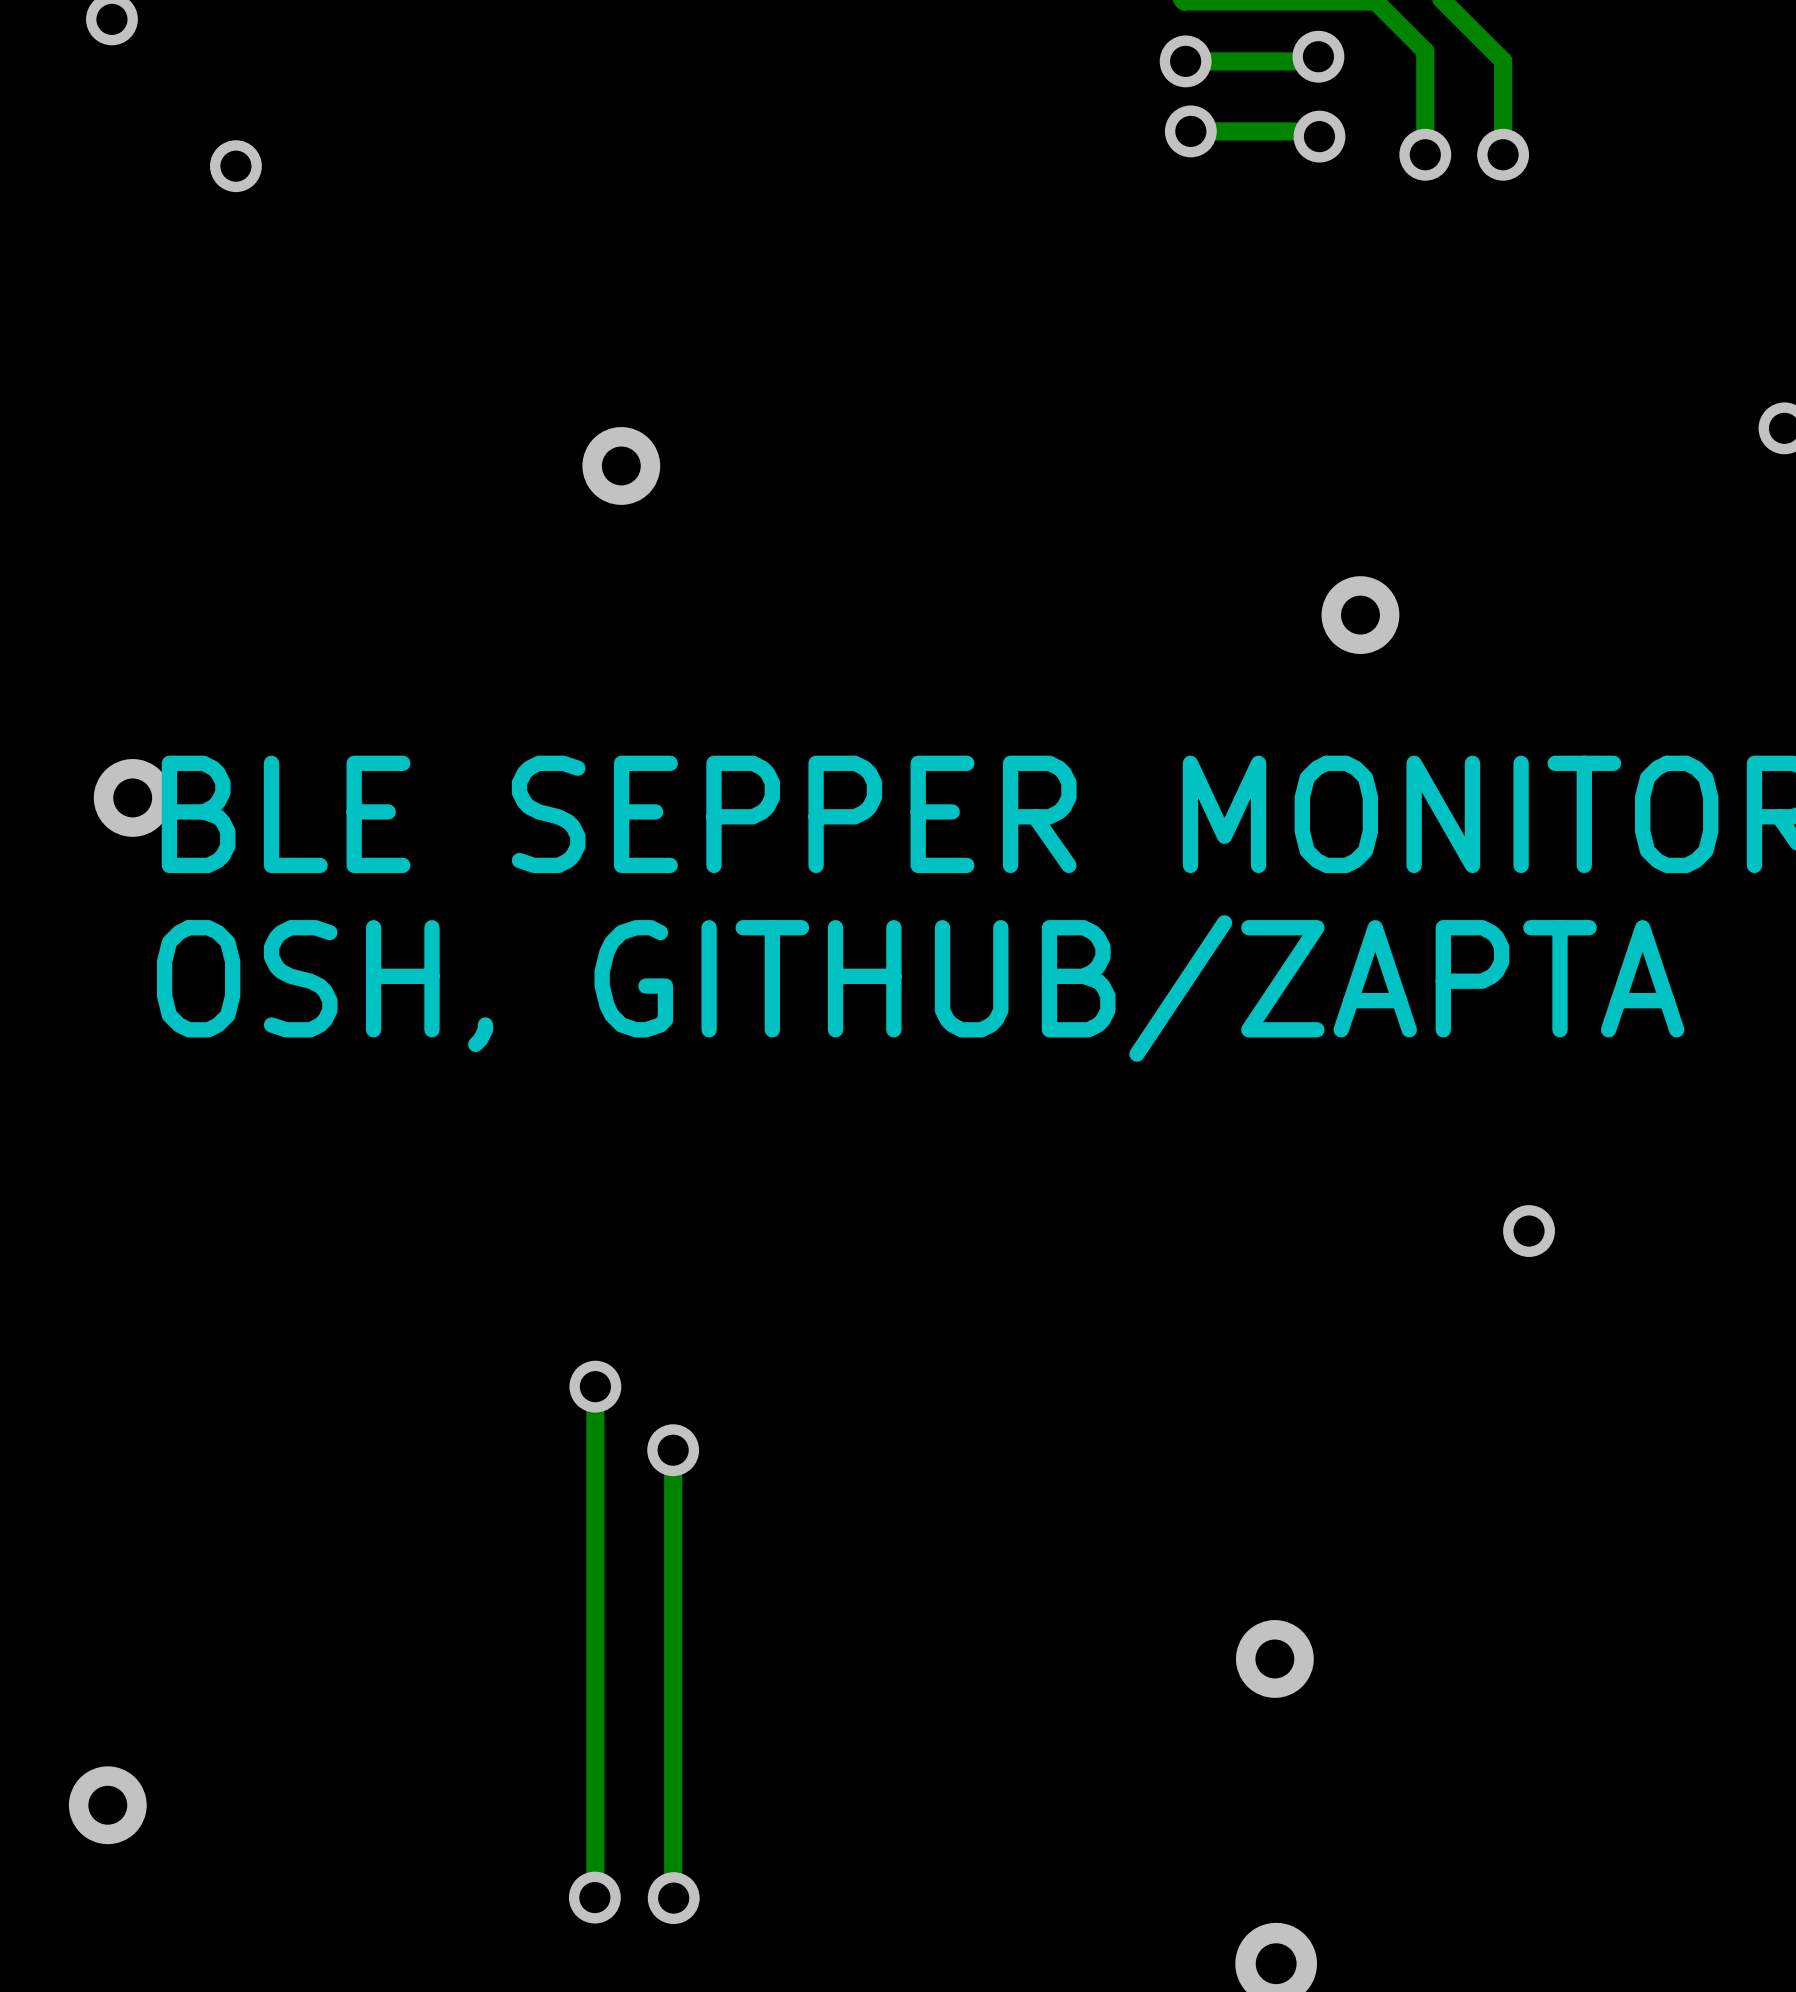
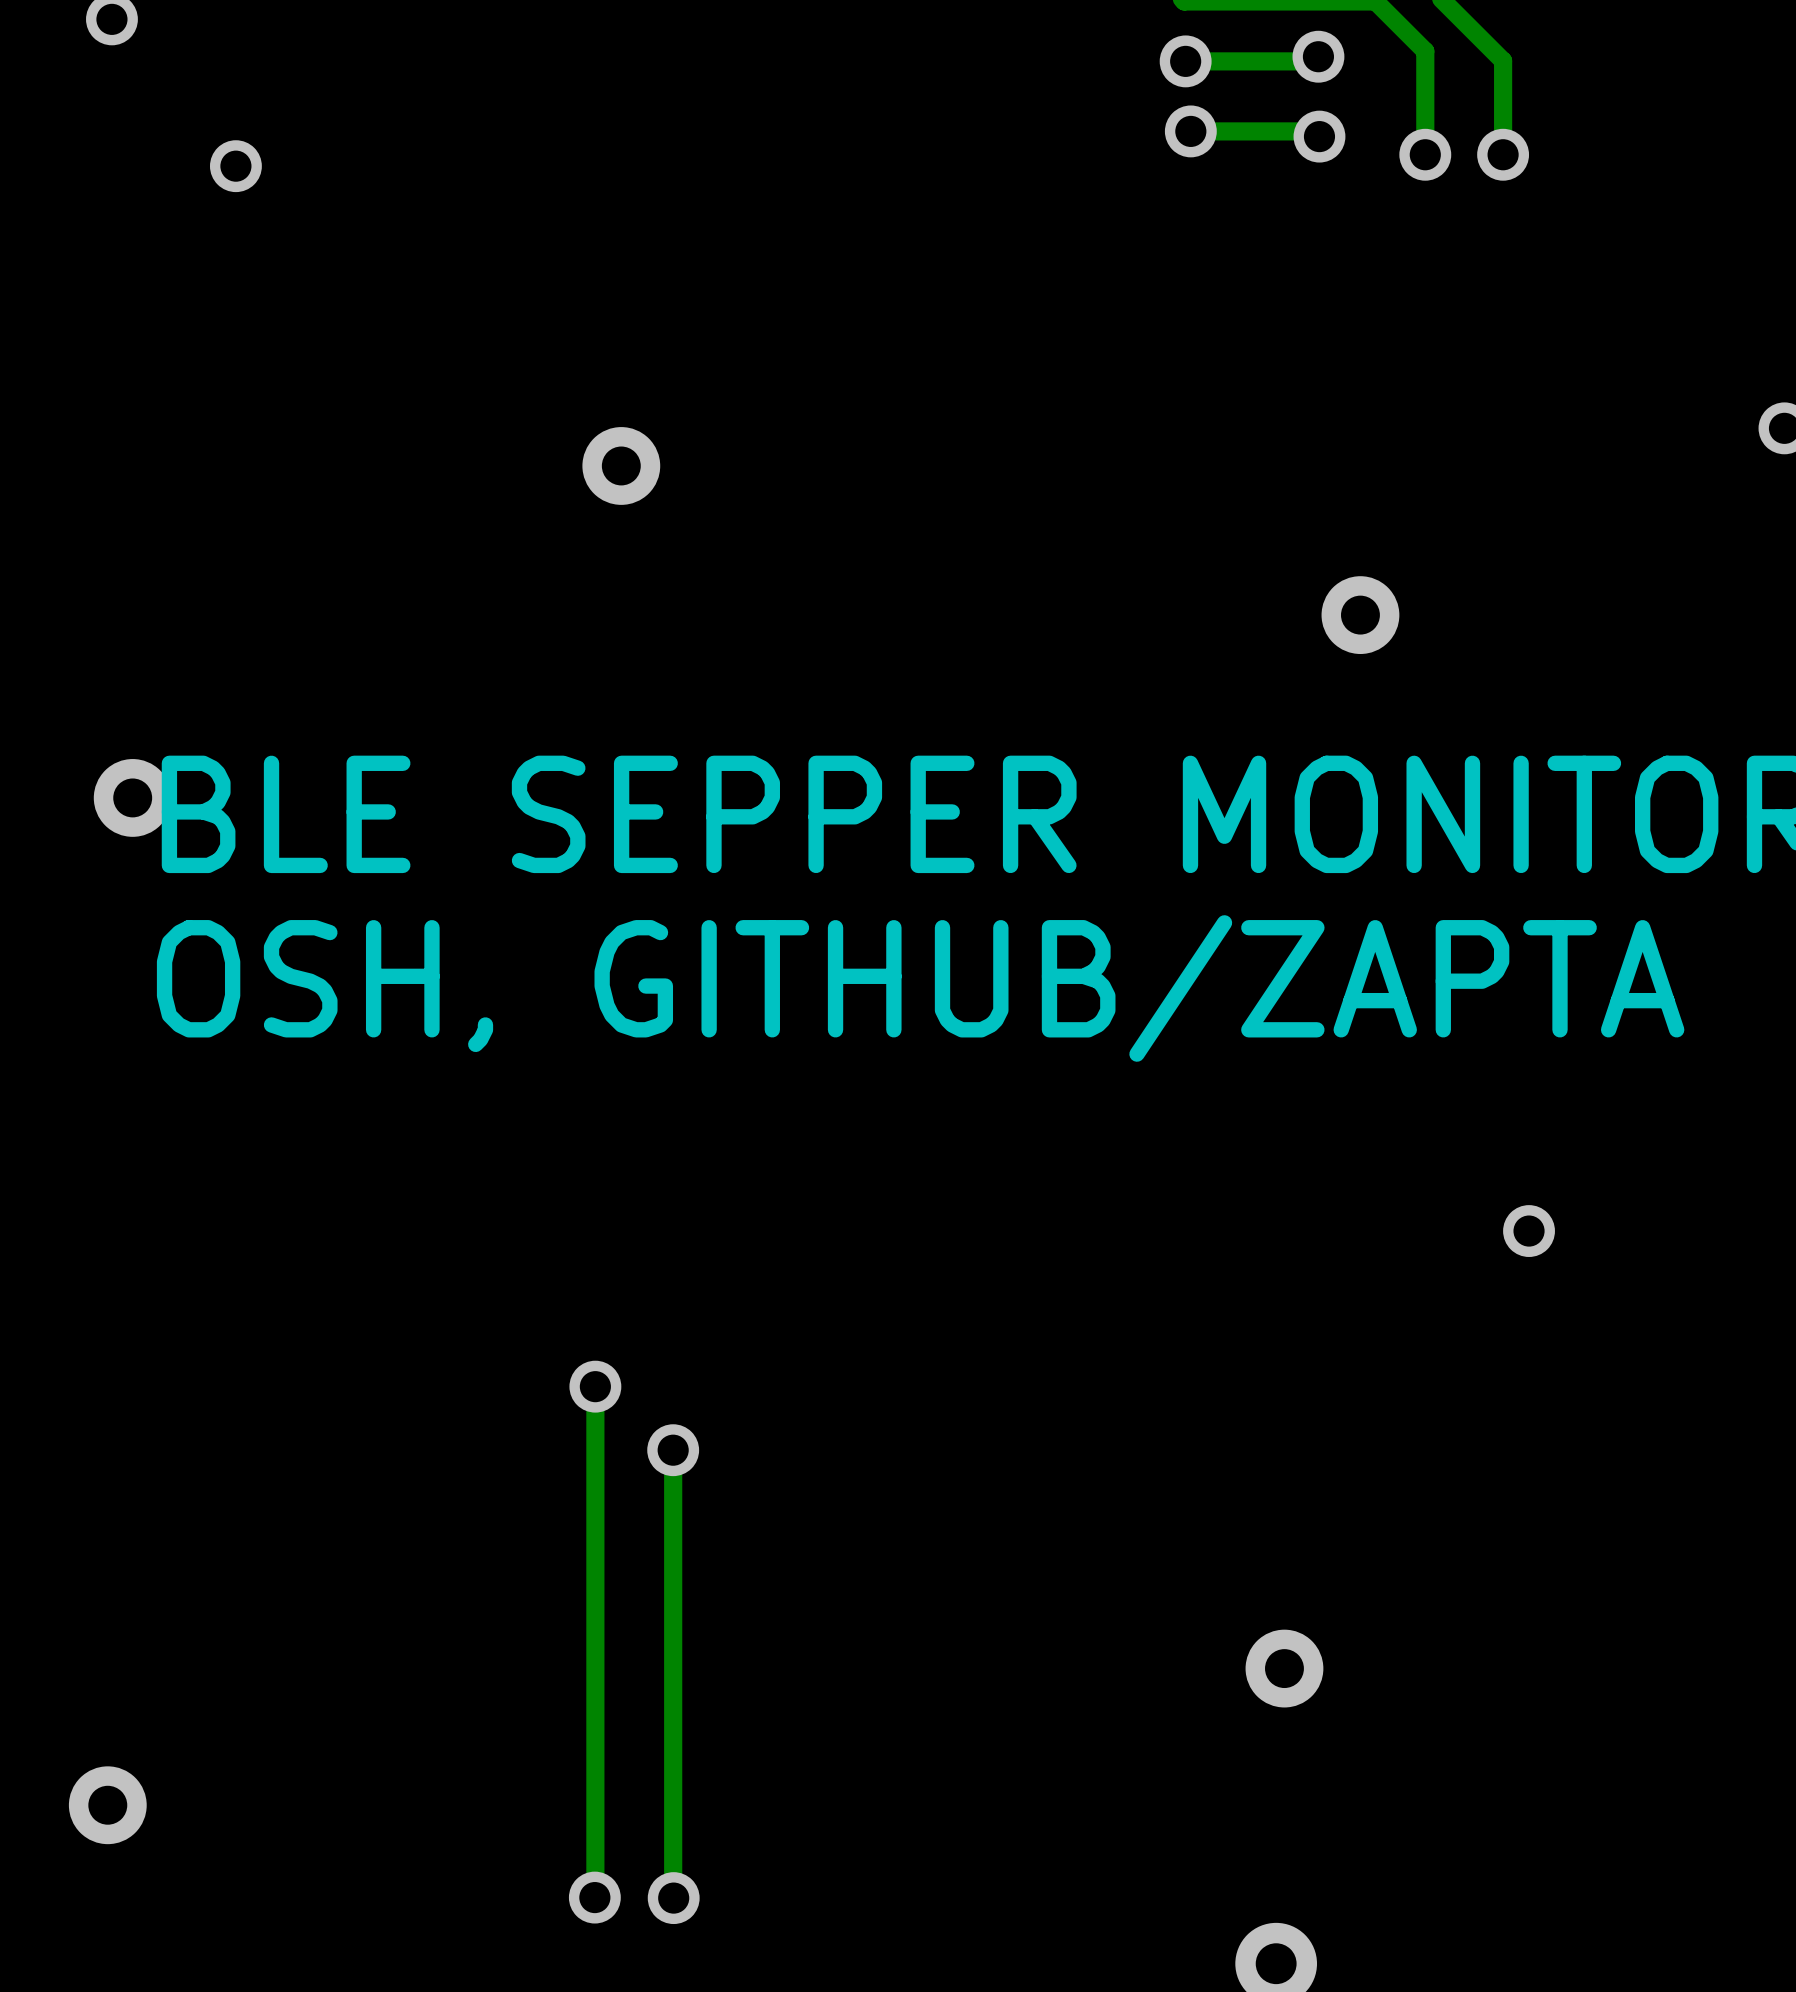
via position: (1274, 1658) -> (1284, 1668)

